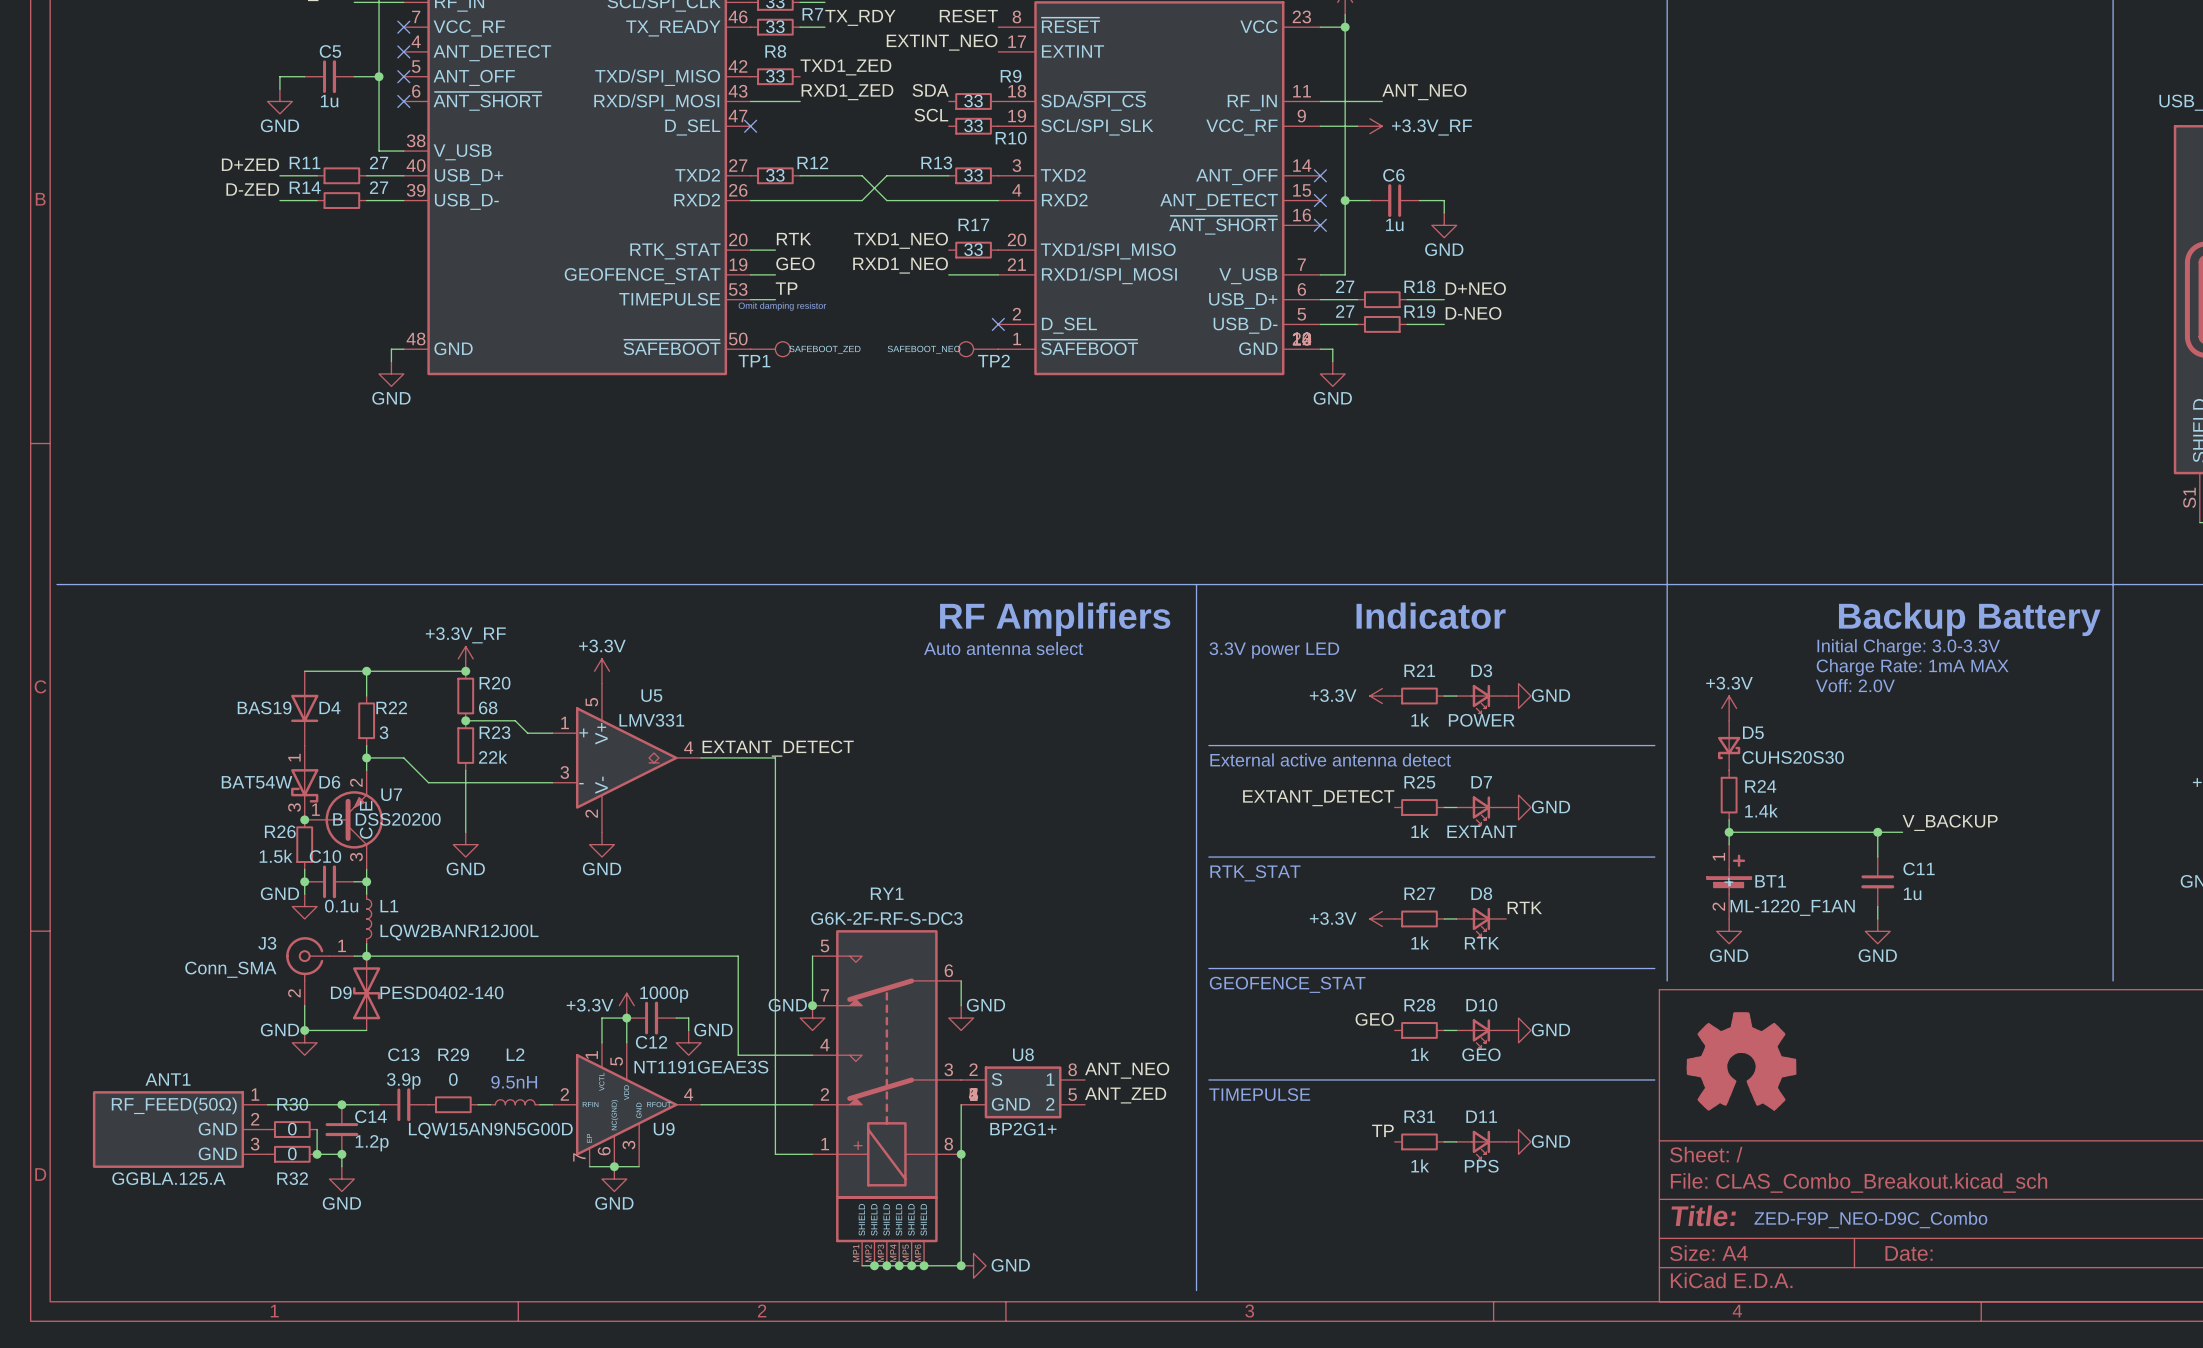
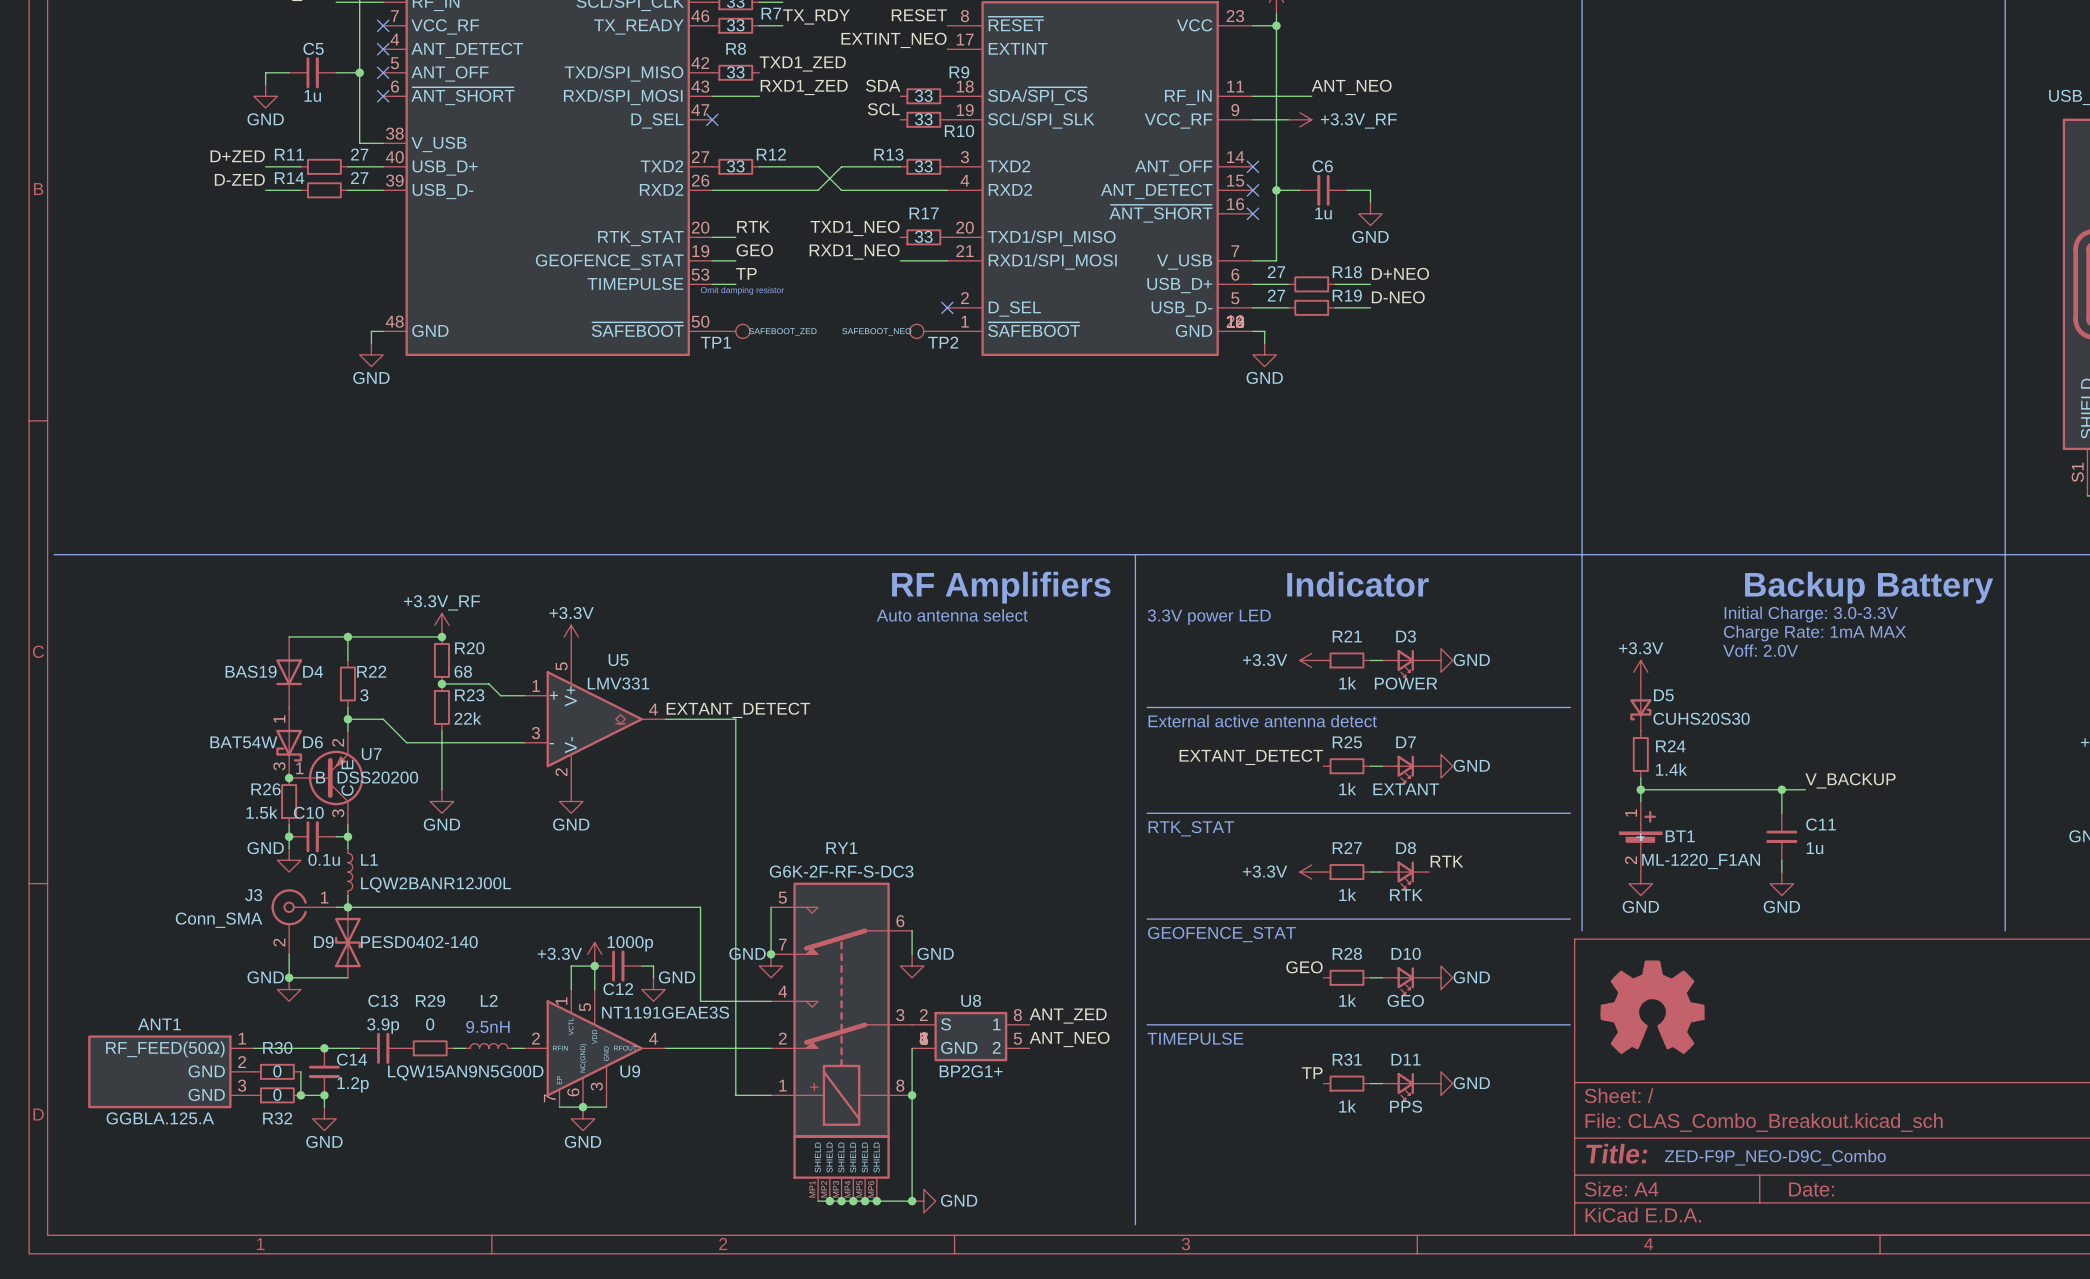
label: ANT_NEO (1127, 1070) -> ANT_ZED (1068, 1016)
label: ANT_ZED (1125, 1095) -> ANT_NEO (1069, 1039)

